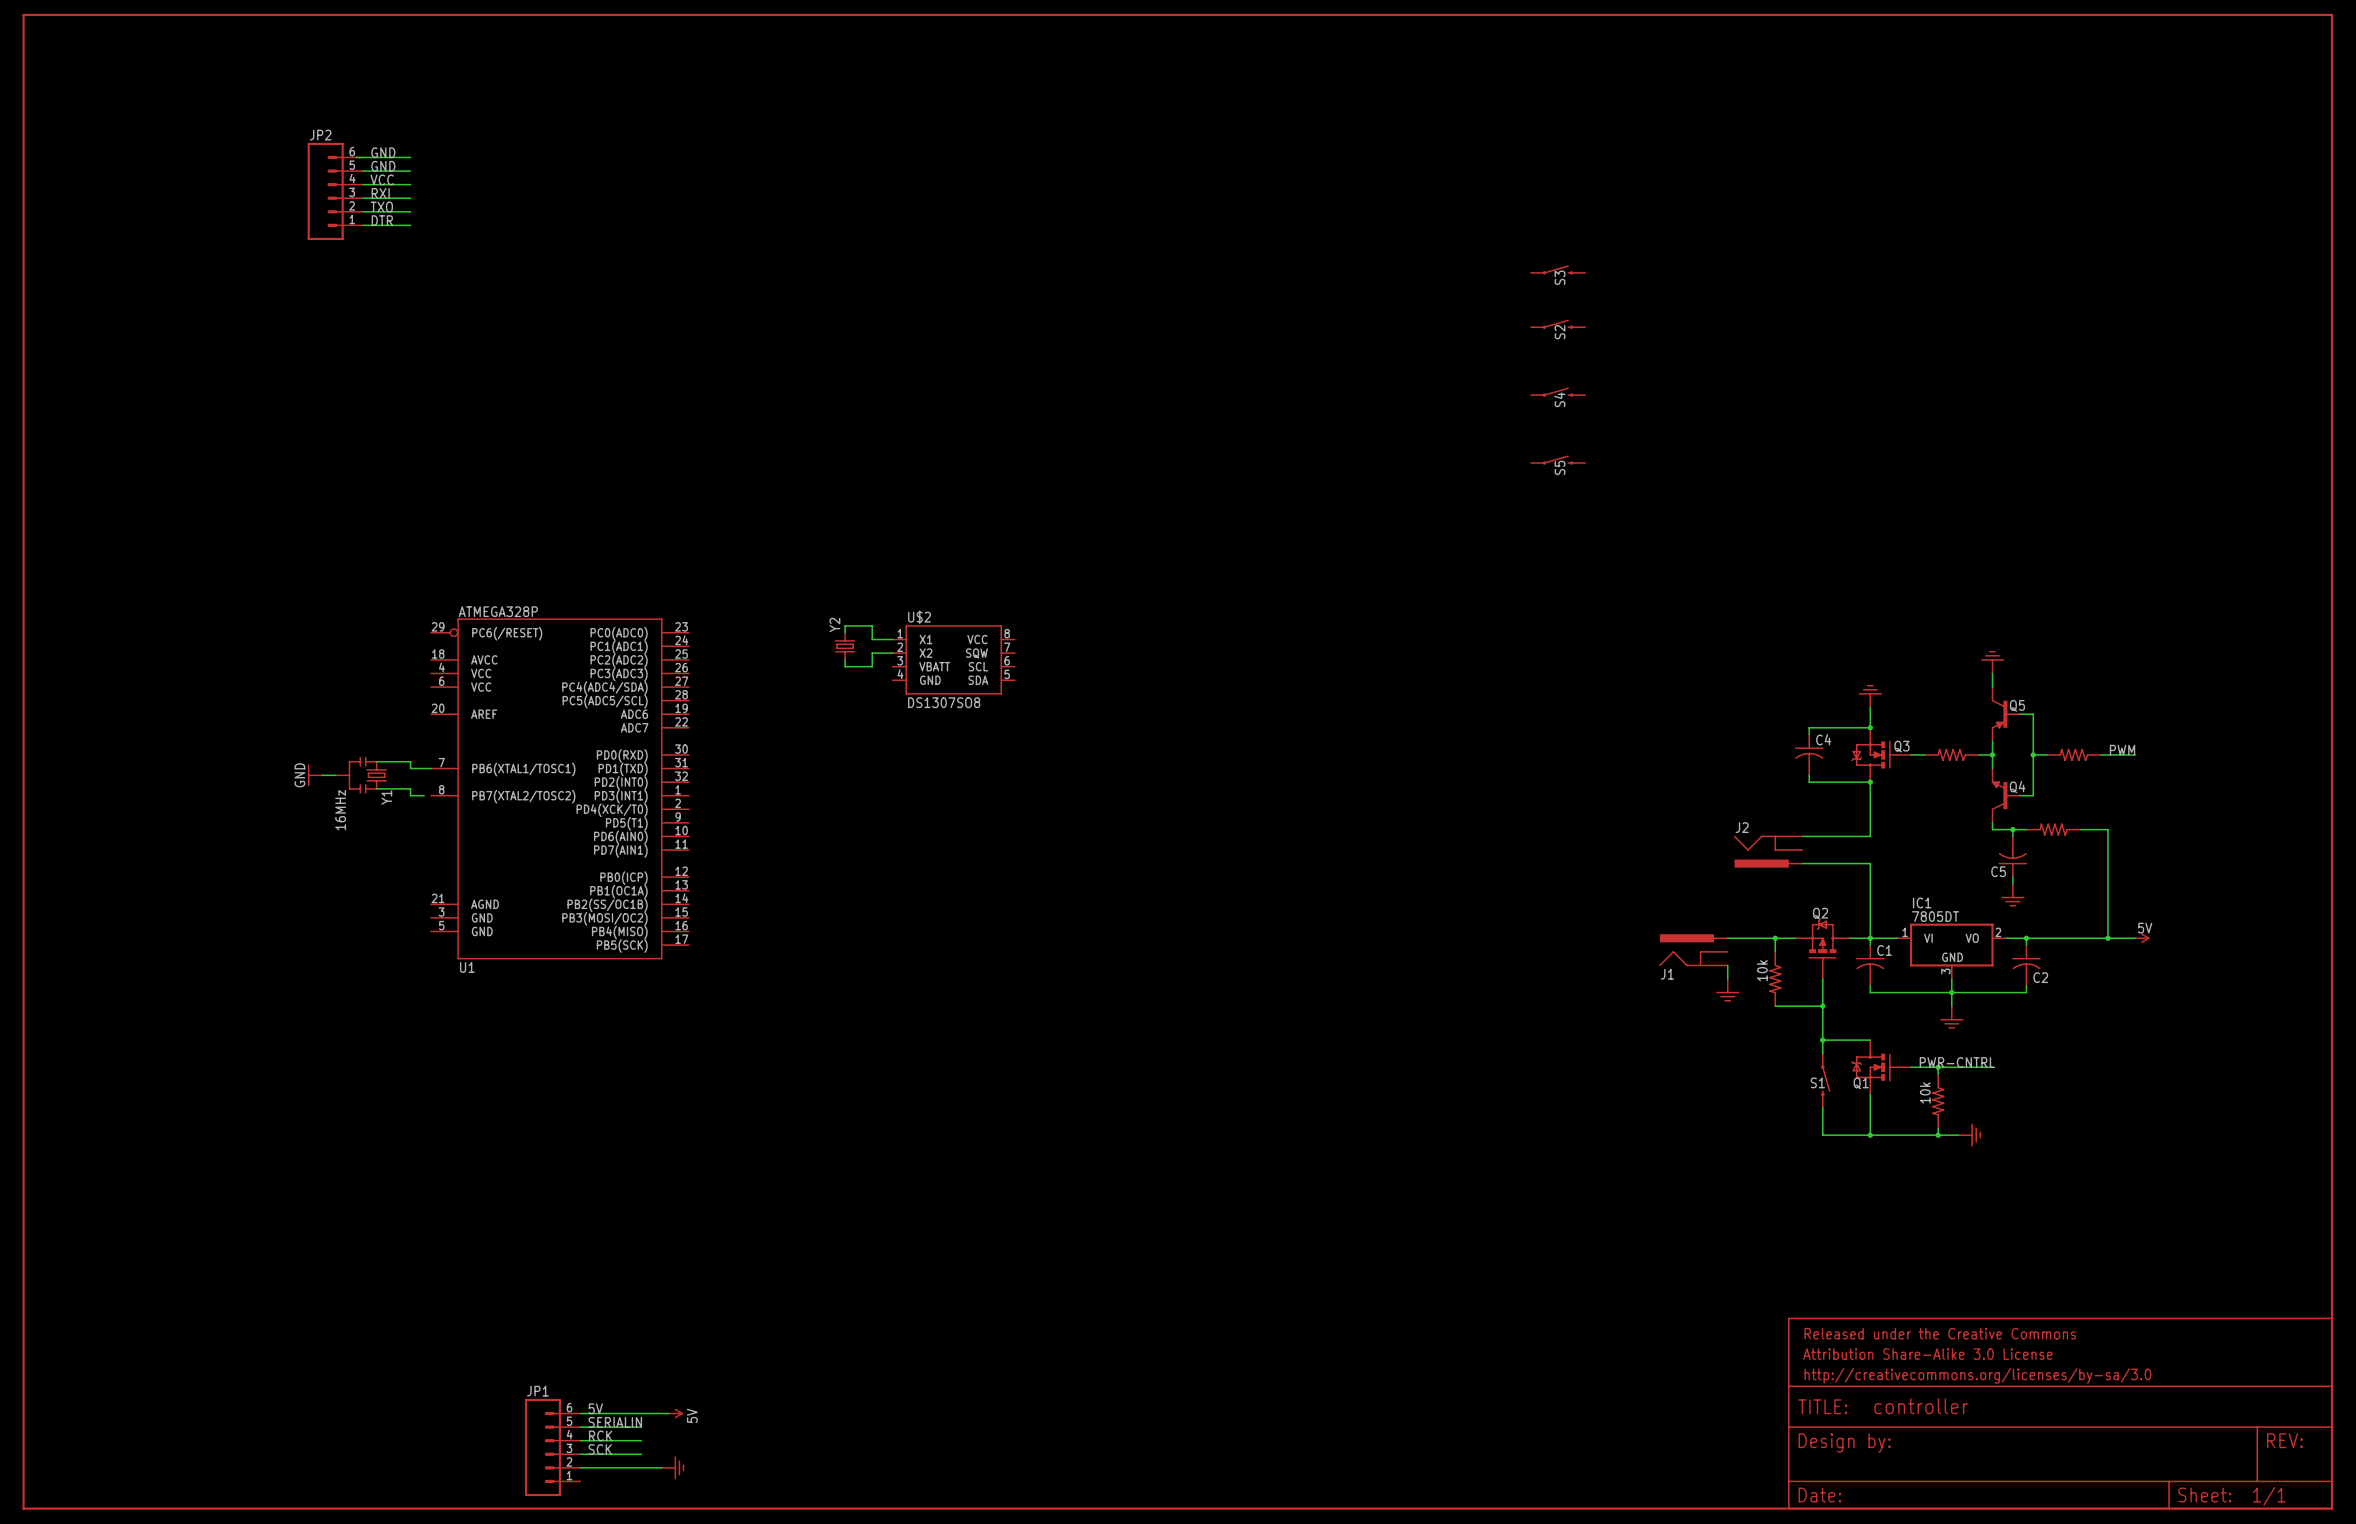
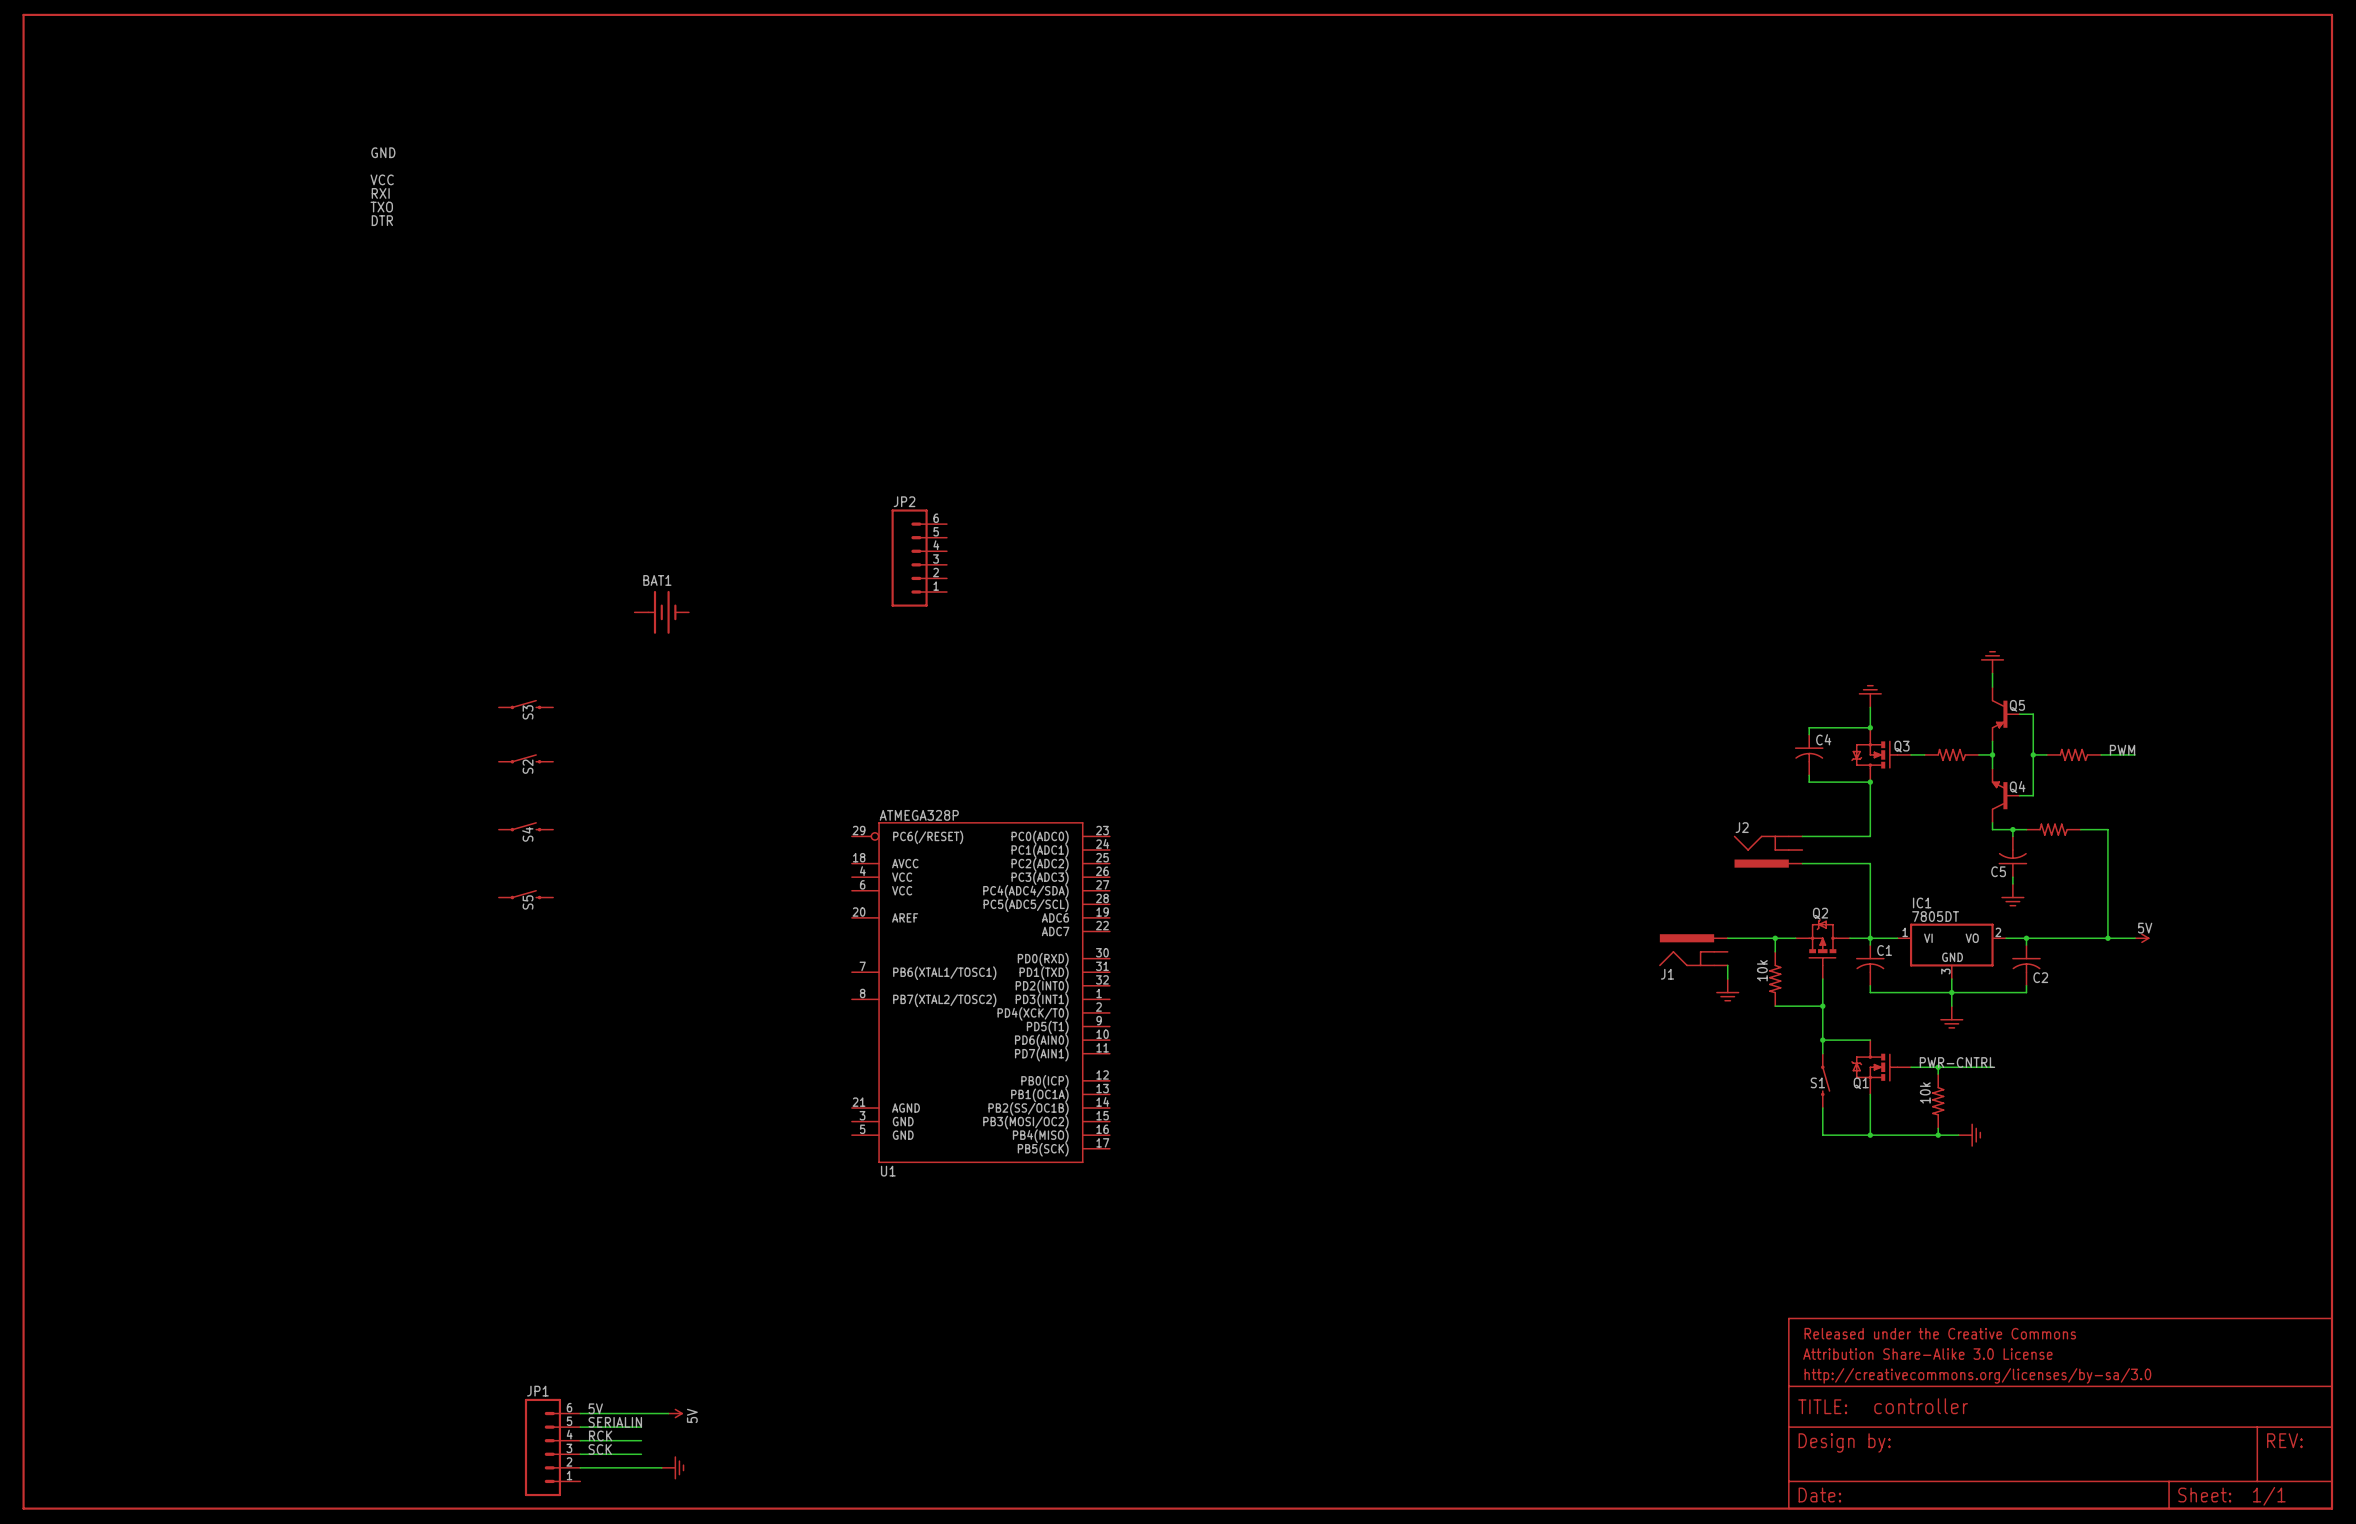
wire: (356, 157) (410, 157) -> none
label: GND (383, 166) -> none
wire: (363, 171) (410, 171) -> none
wire: (363, 184) (410, 184) -> none
JP2 position: (335, 191) -> (919, 558)
wire: (363, 198) (410, 198) -> none
wire: (363, 211) (410, 211) -> none
wire: (363, 225) (410, 225) -> none
S3 position: (1558, 270) -> (525, 704)
S2 position: (1558, 324) -> (525, 758)
S4 position: (1558, 392) -> (525, 826)
S5 position: (1558, 460) -> (525, 894)
BAT1: none -> (661, 612)
wire: (845, 632) (845, 625) (872, 625) (872, 639) (892, 639) -> none
Y2: (845, 646) -> none
wire: (892, 653) (872, 653) (872, 666) (845, 666) (845, 659) -> none
U$2: DS1307SO8 (953, 659) -> none
wire: (376, 761) (410, 761) (410, 768) (430, 768) -> none
power symbol: GND (315, 775) -> none
wire: (322, 775) (335, 775) -> none
Y1: 16MHz (361, 775) -> none
wire: (376, 788) (410, 788) (410, 795) (424, 795) -> none
U1 position: (559, 788) -> (980, 992)

